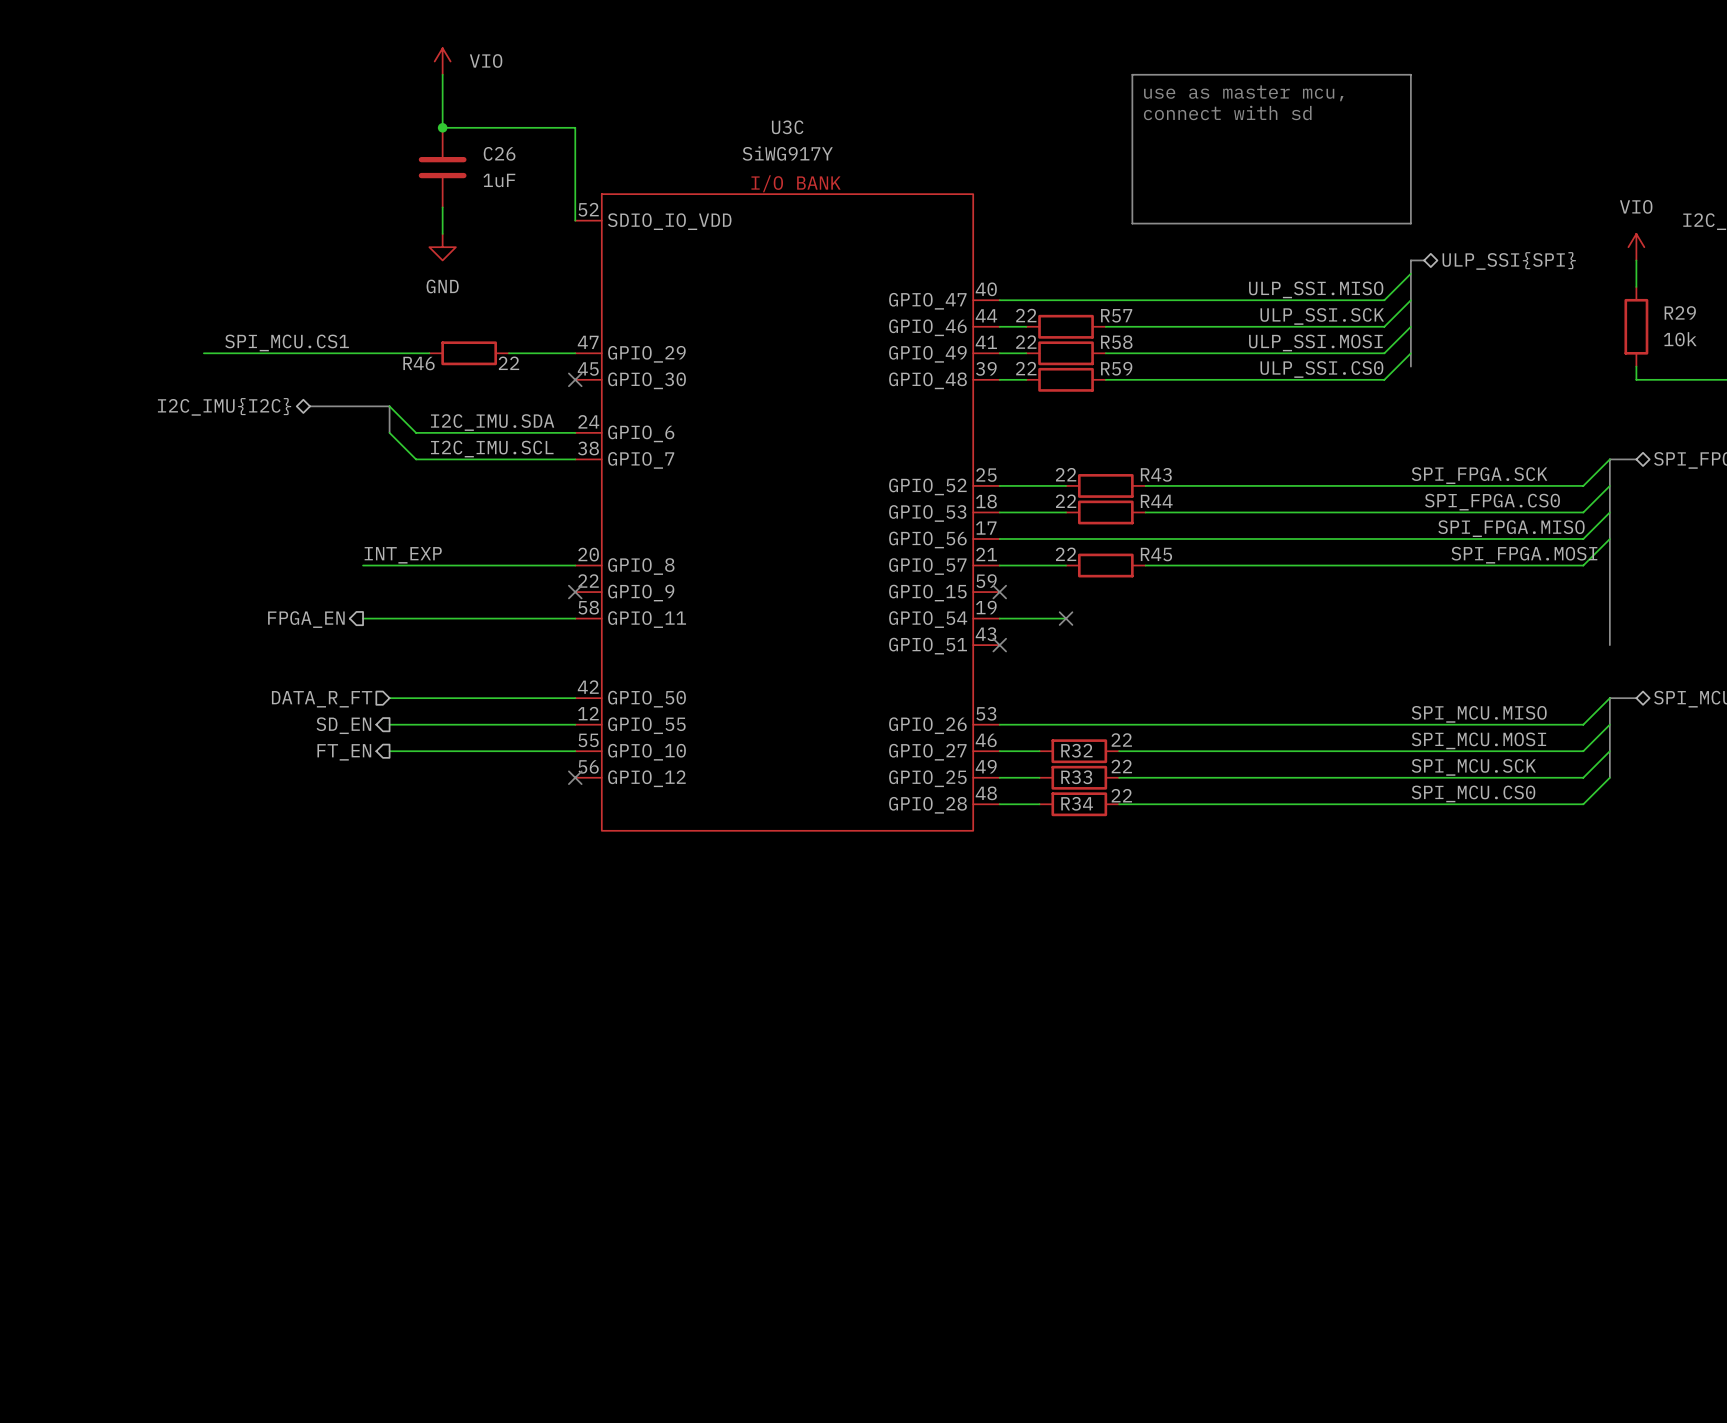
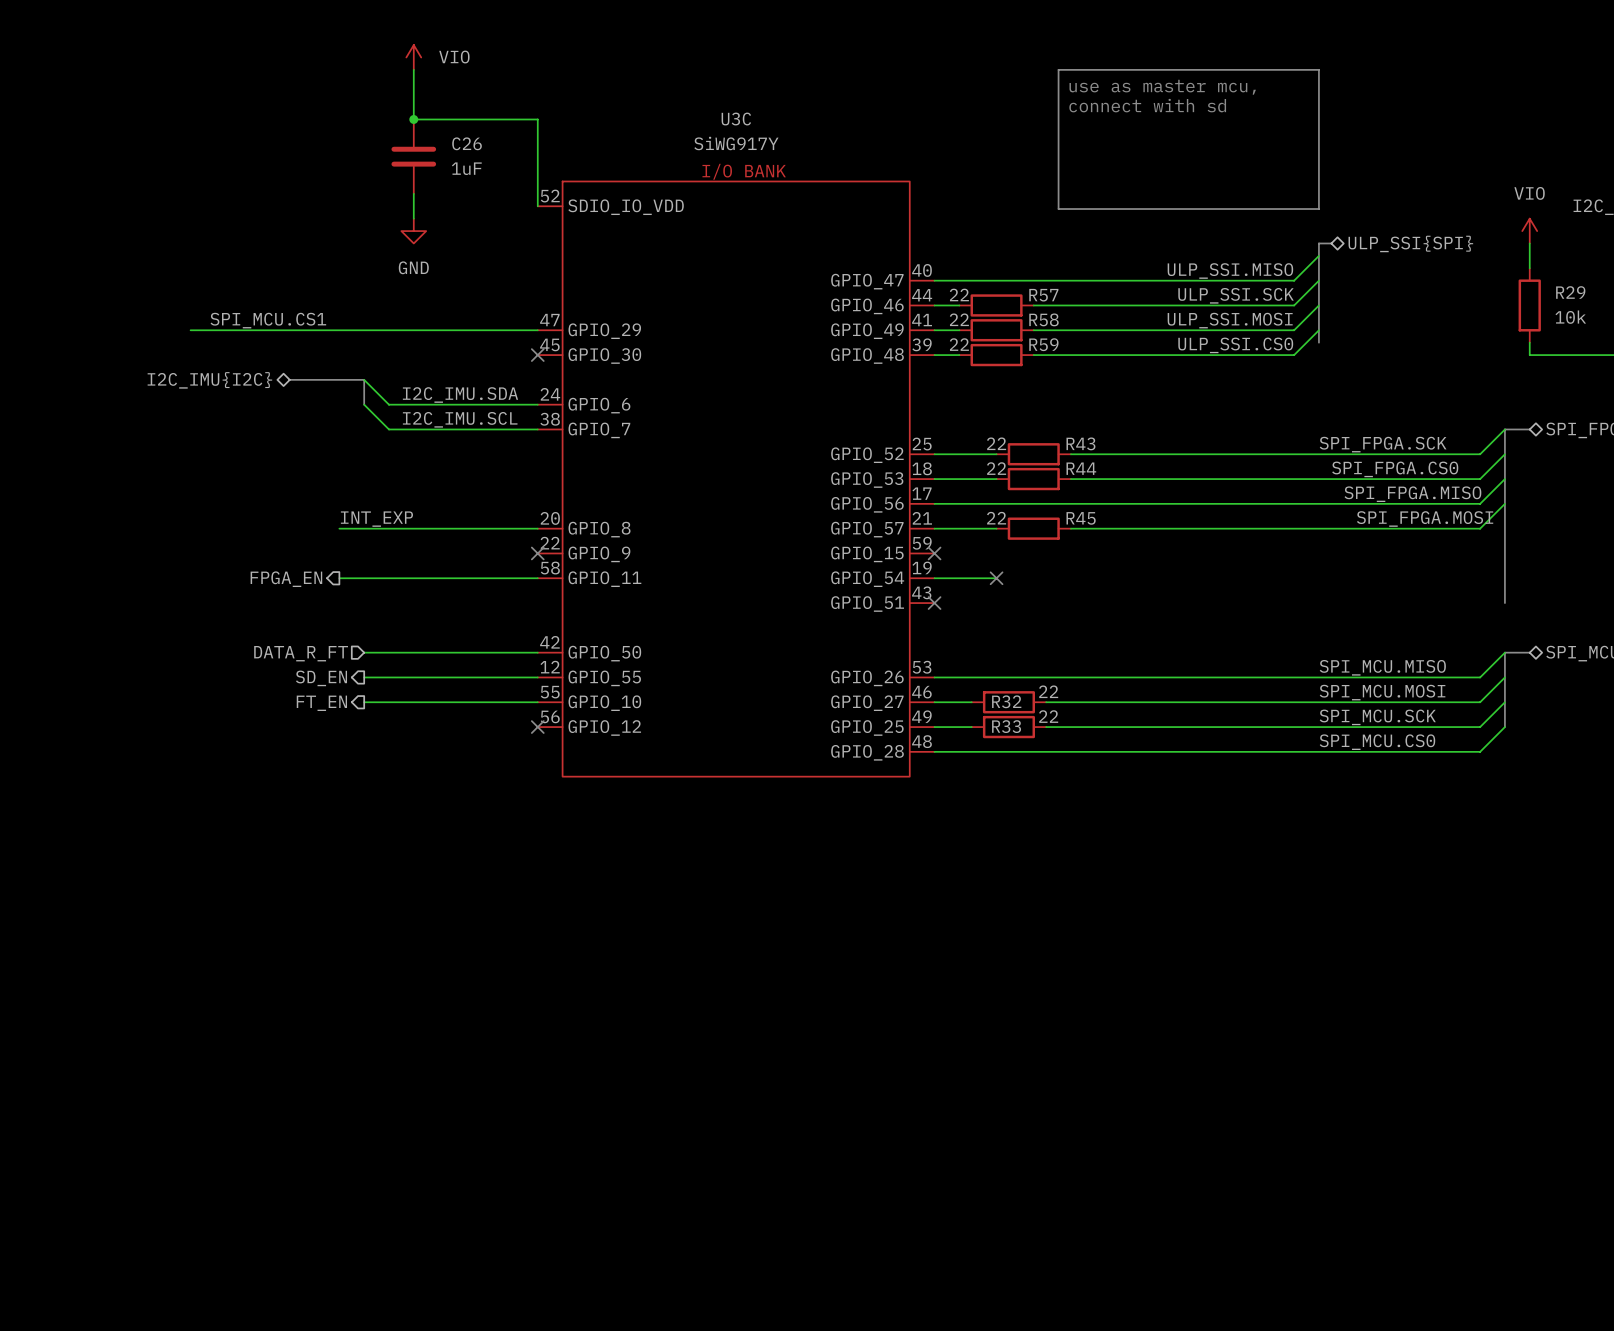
wire: none -> (401, 330) (475, 330)
R46: 22 (469, 353) -> none
wire: none -> (971, 751) (1046, 751)
R34: 22 (1079, 804) -> none

